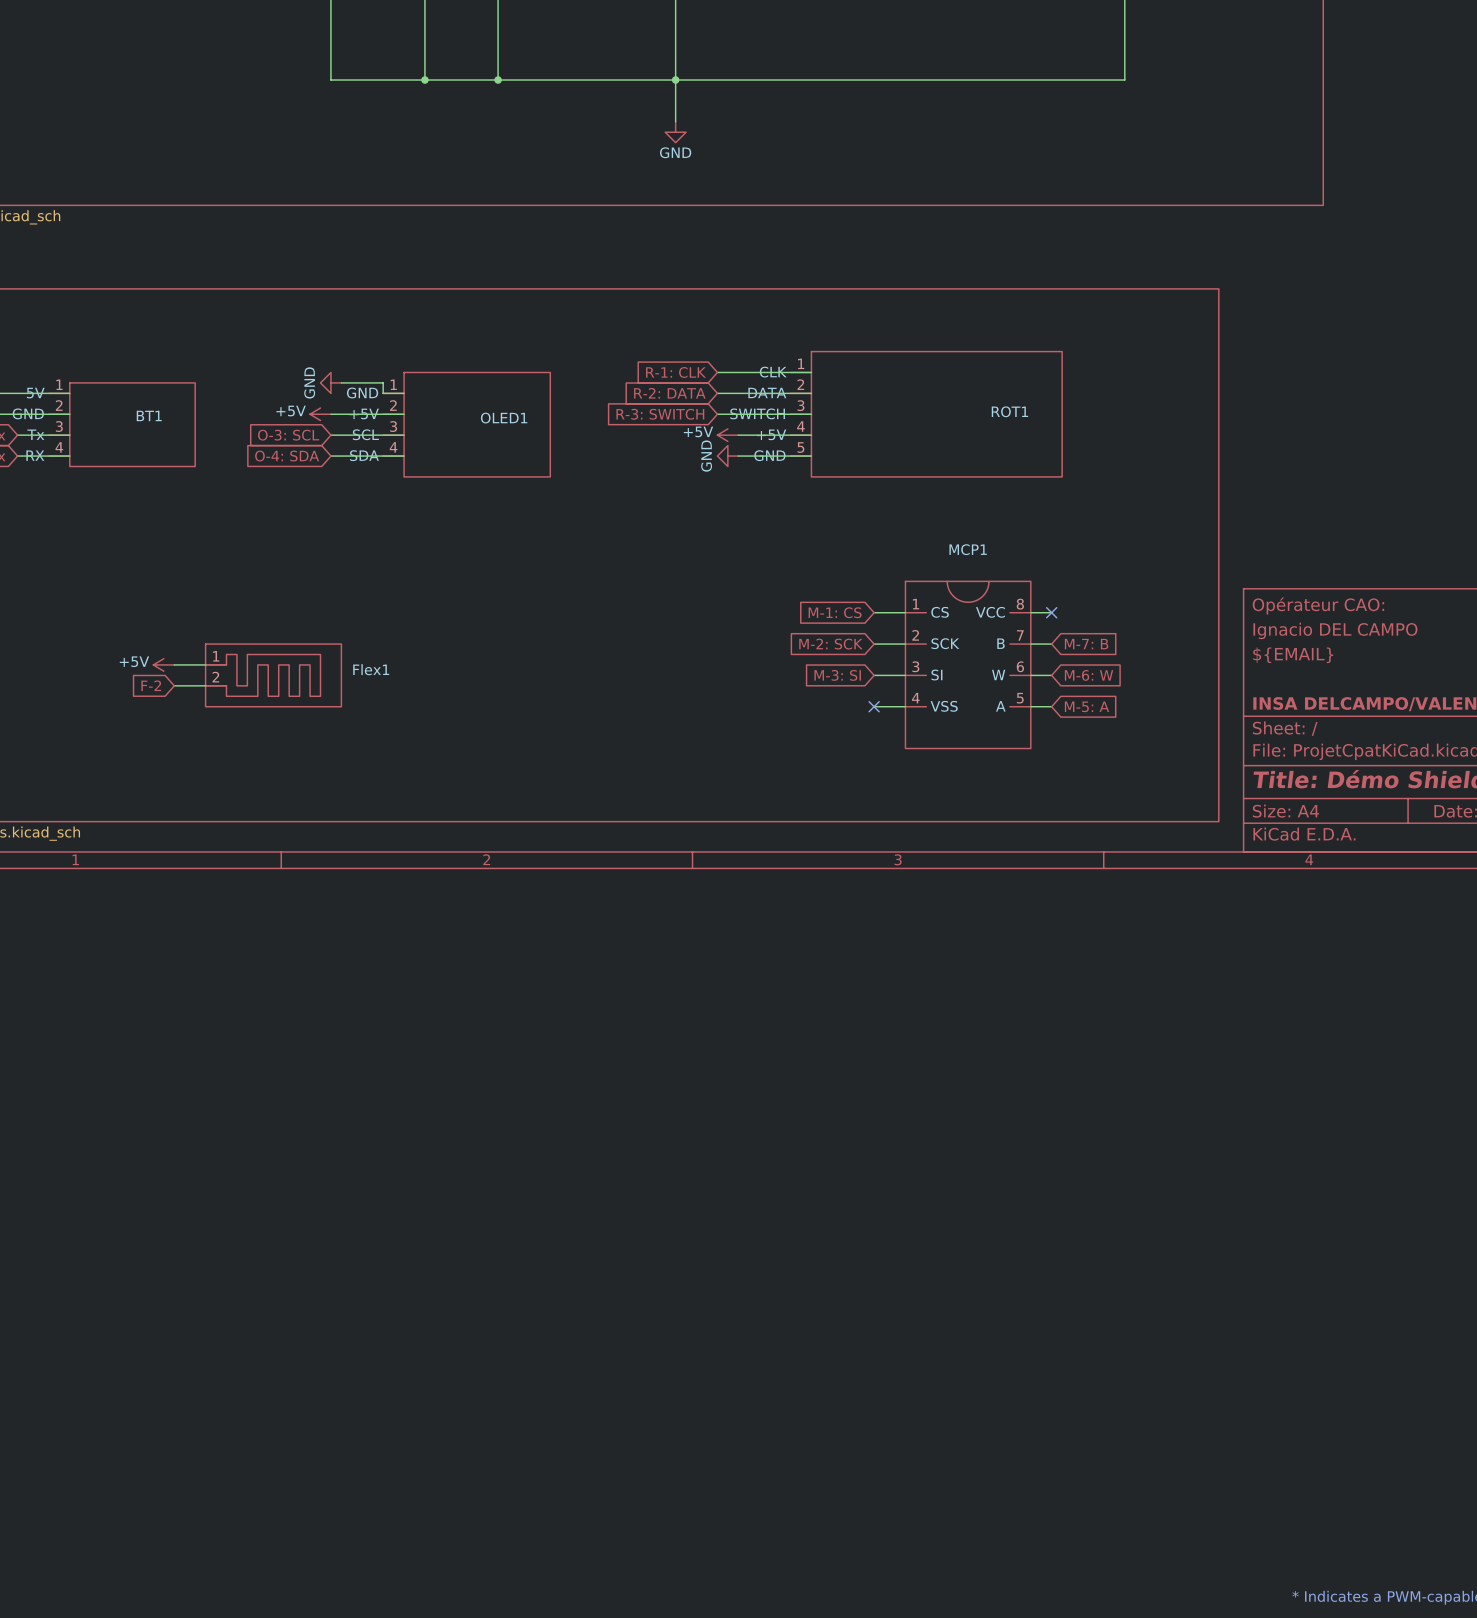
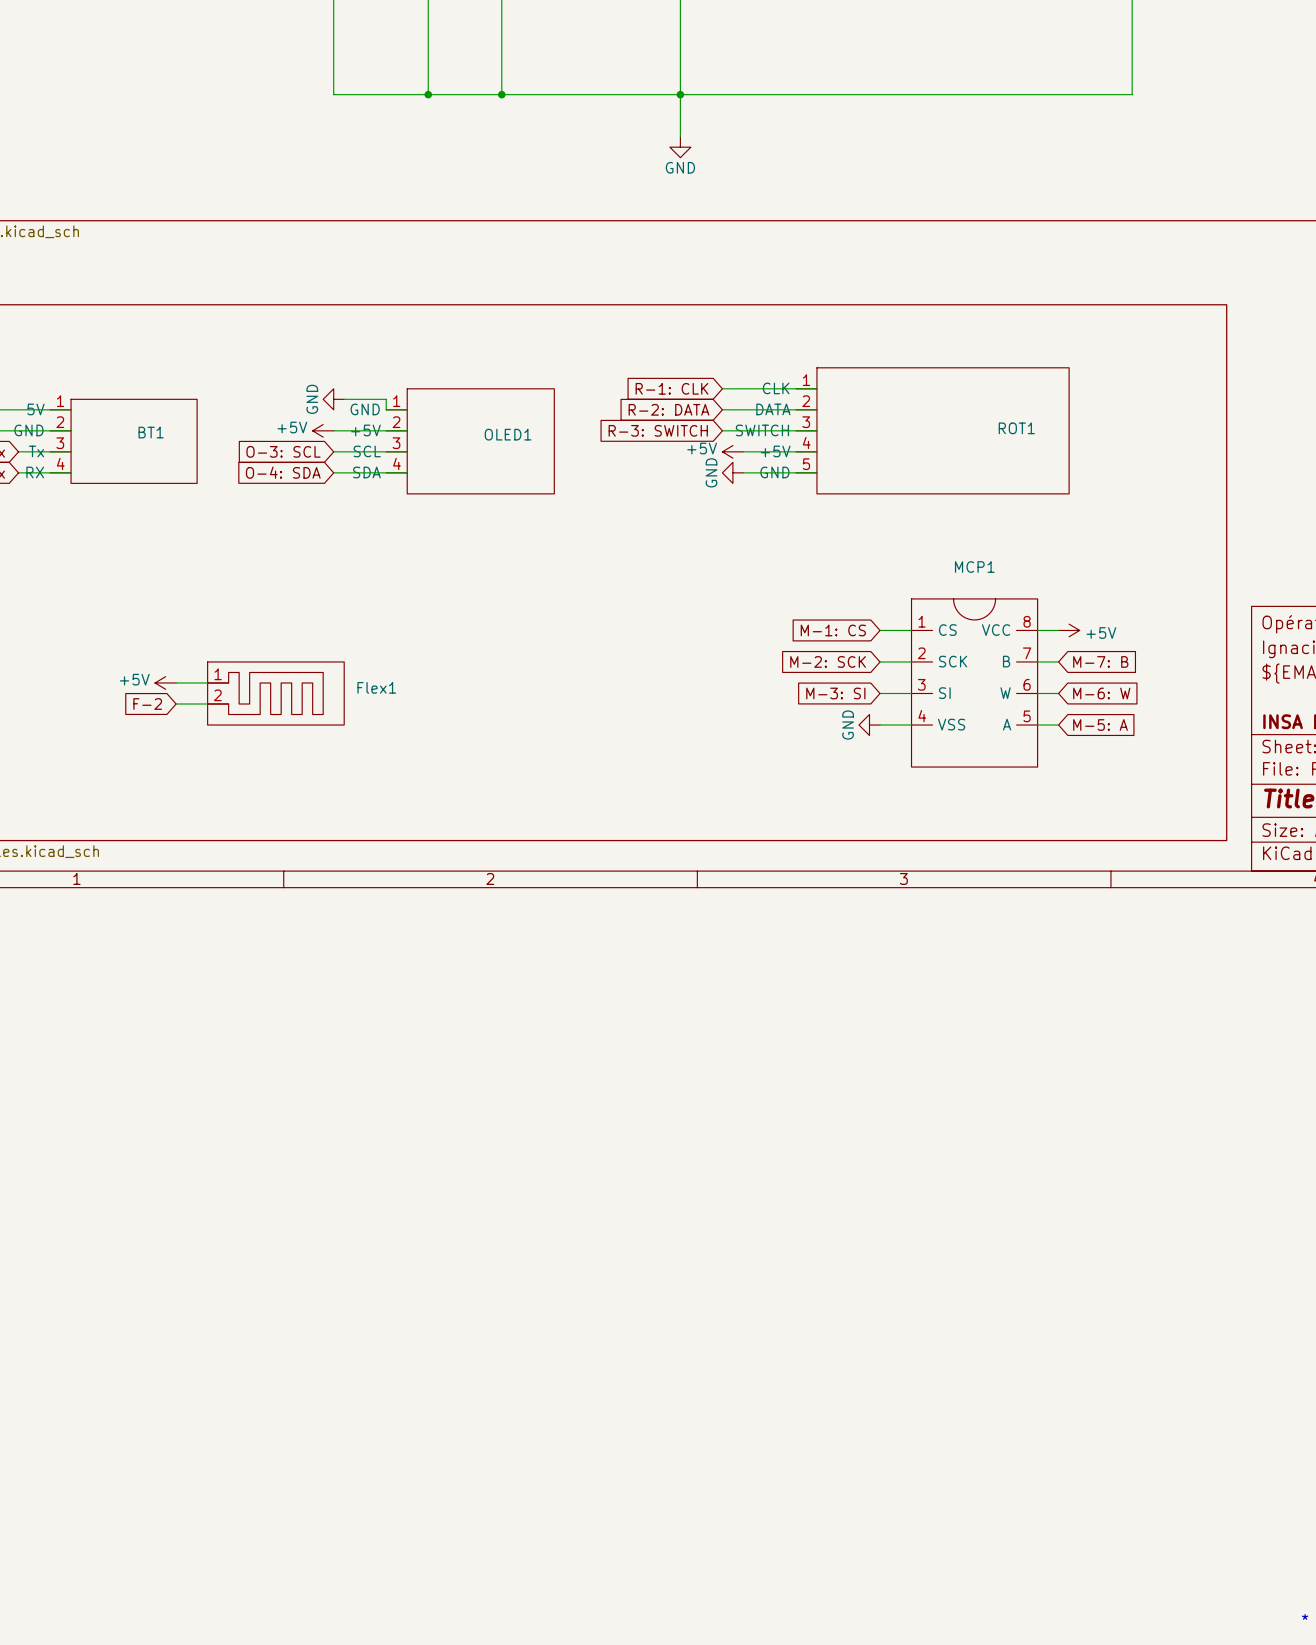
no-connect mark: (1051, 612) -> none
power symbol: none -> +5V (1069, 630)
power symbol: none -> GND (869, 725)
no-connect mark: (874, 706) -> none

